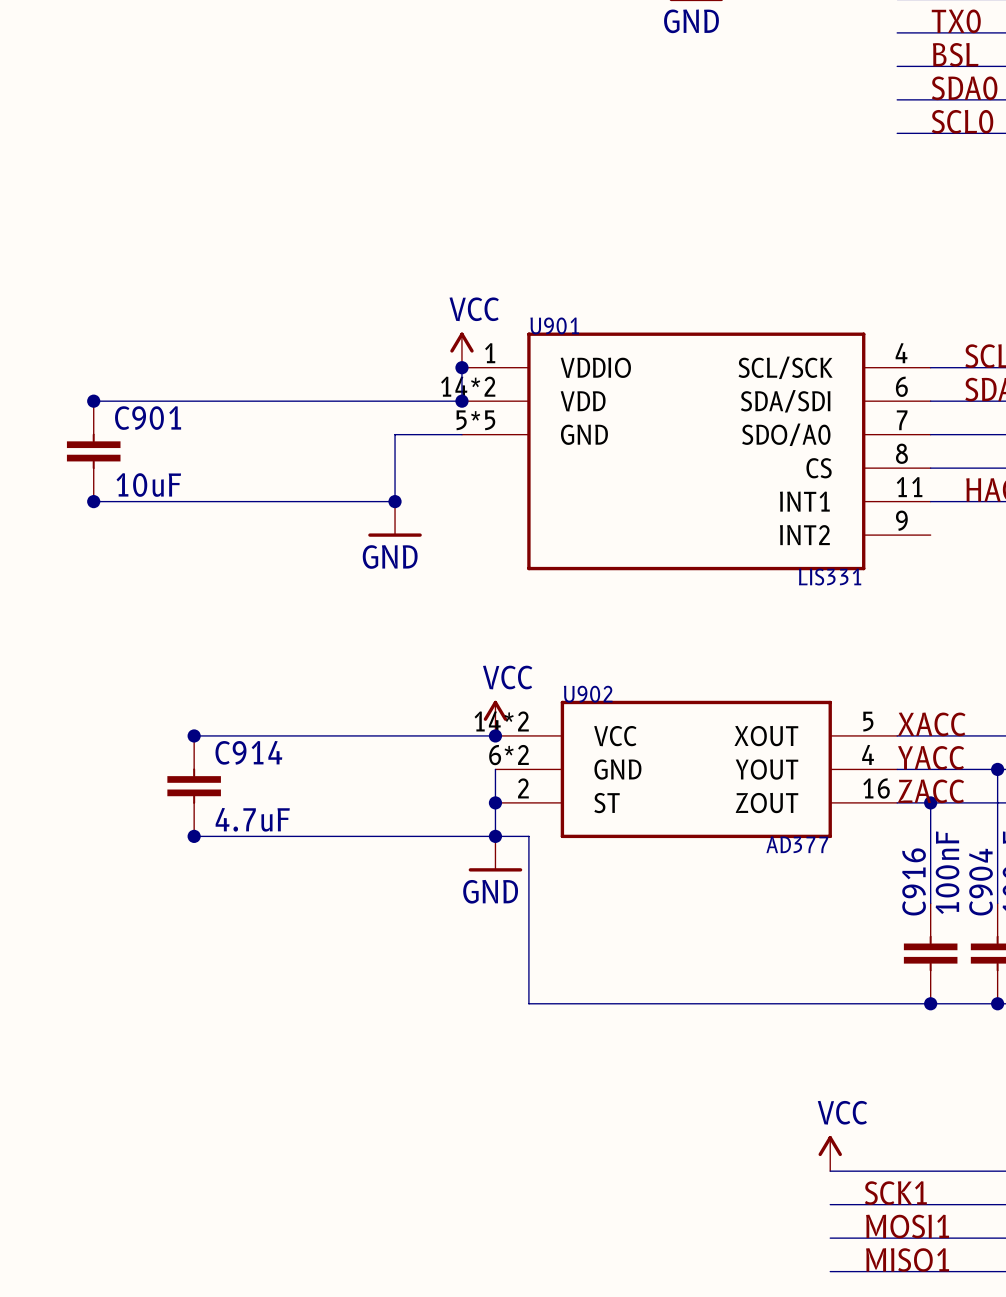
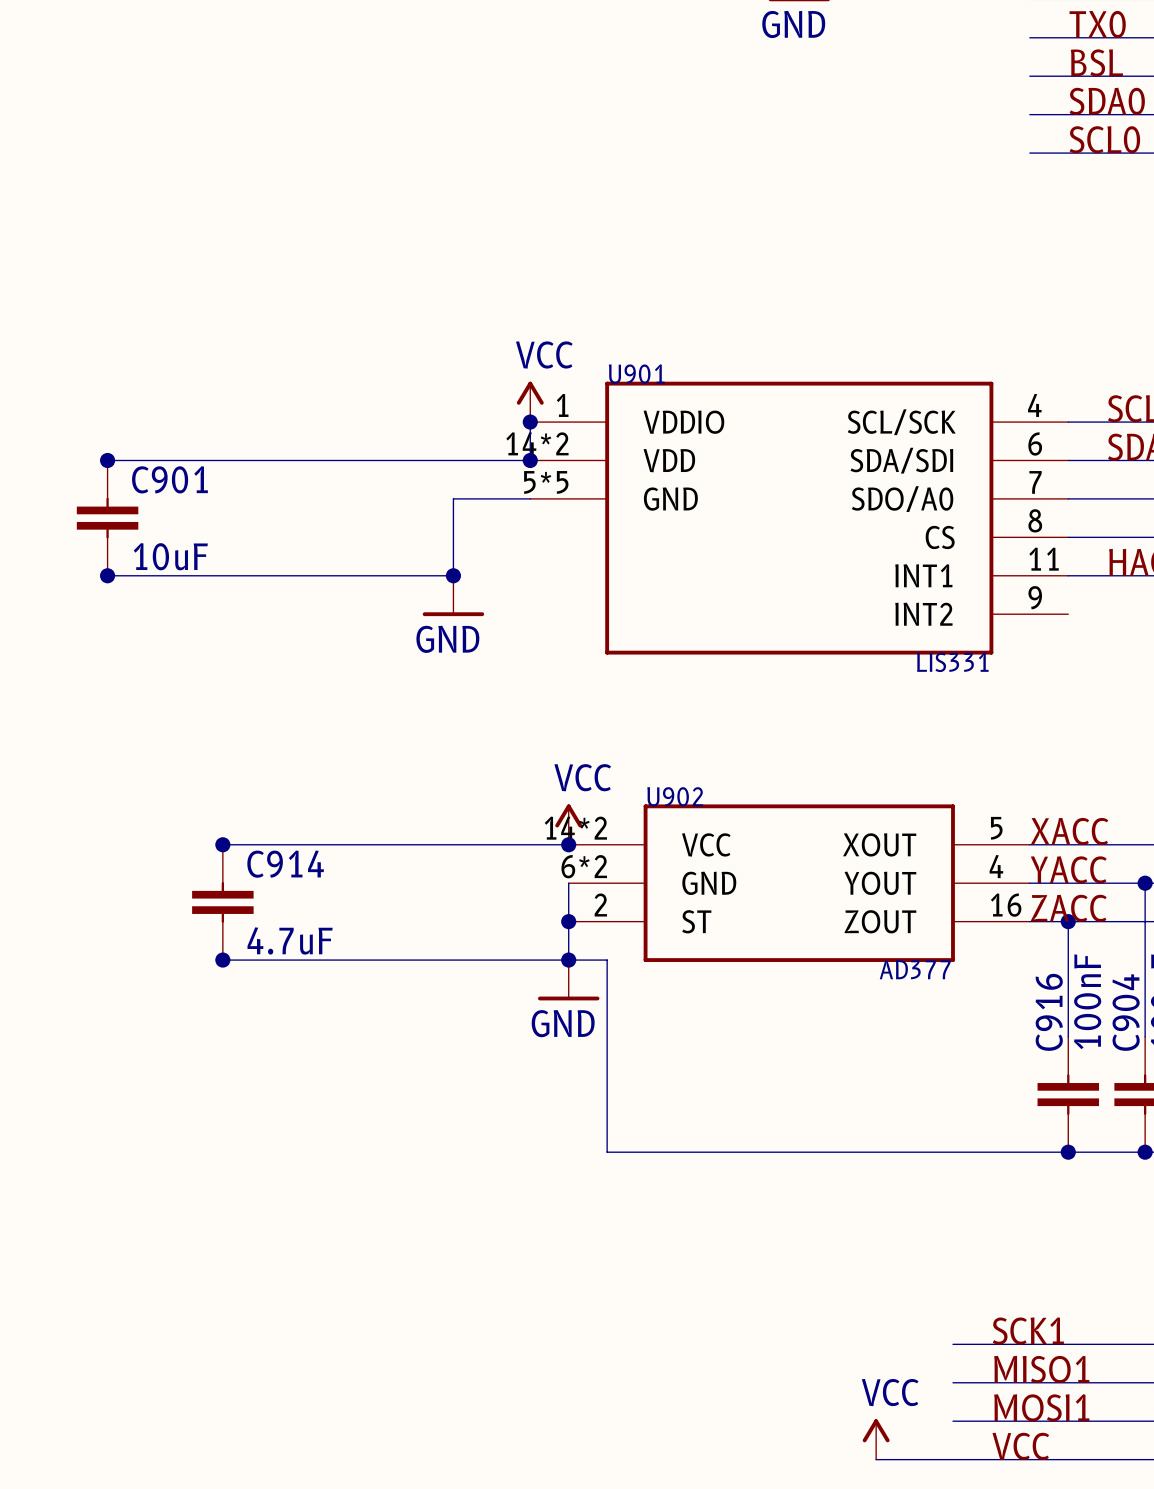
power symbol position: VCC (830, 1153) -> VCC (876, 1439)
label: none -> SCK1 (1028, 1331)
label: SCK1 (895, 1193) -> MISO1 (1041, 1369)
label: MISO1 (907, 1260) -> VCC (1020, 1446)
wire: none -> (876, 1459) (952, 1459)

